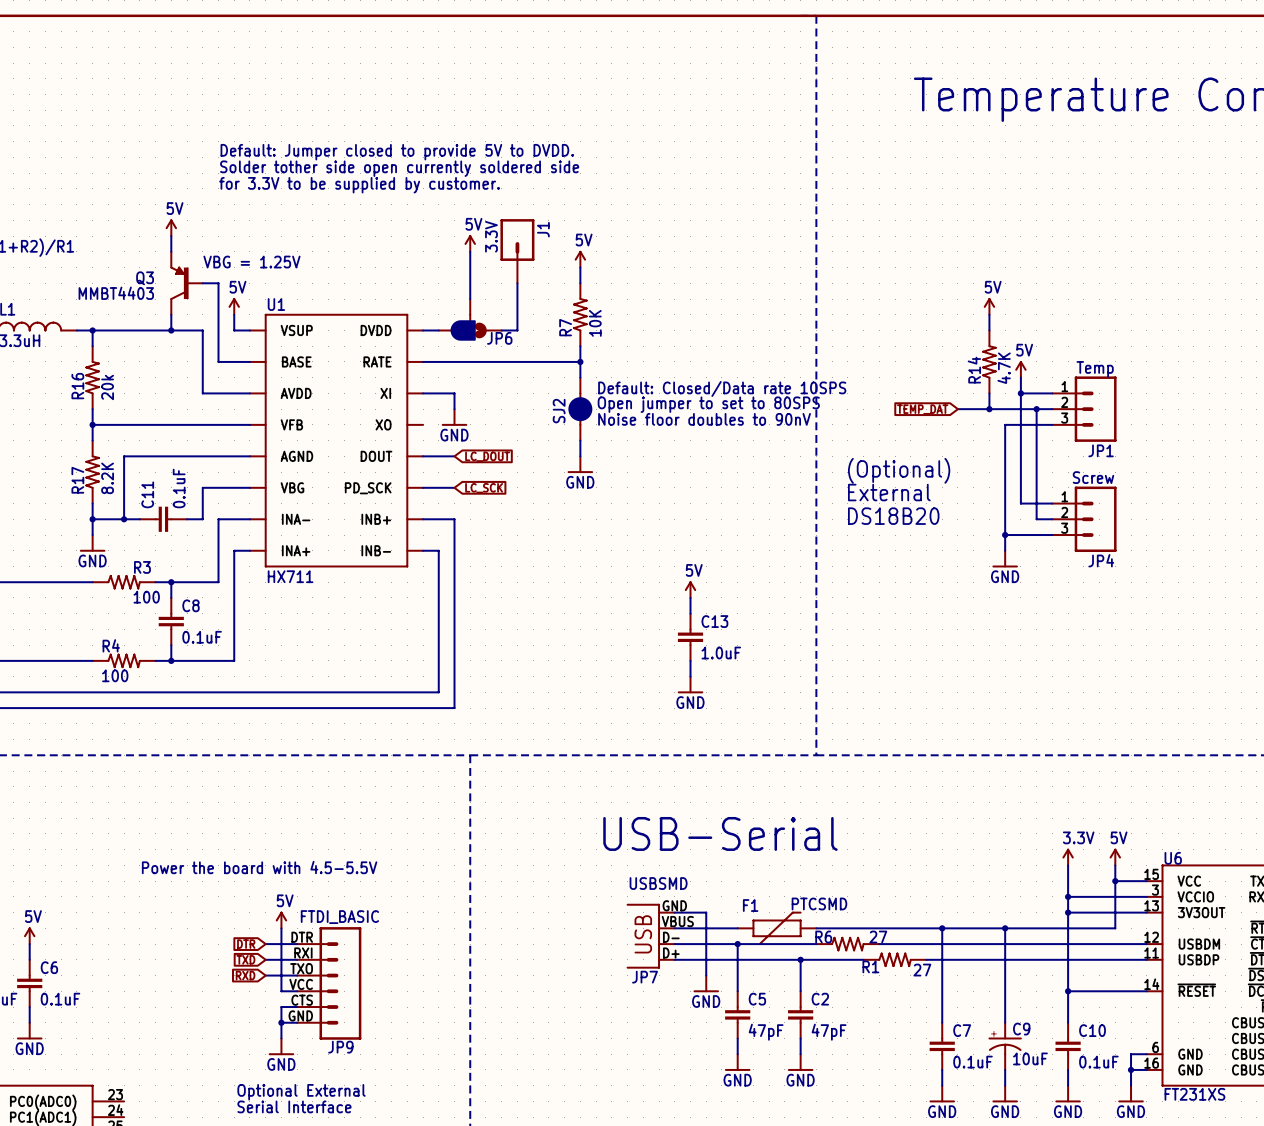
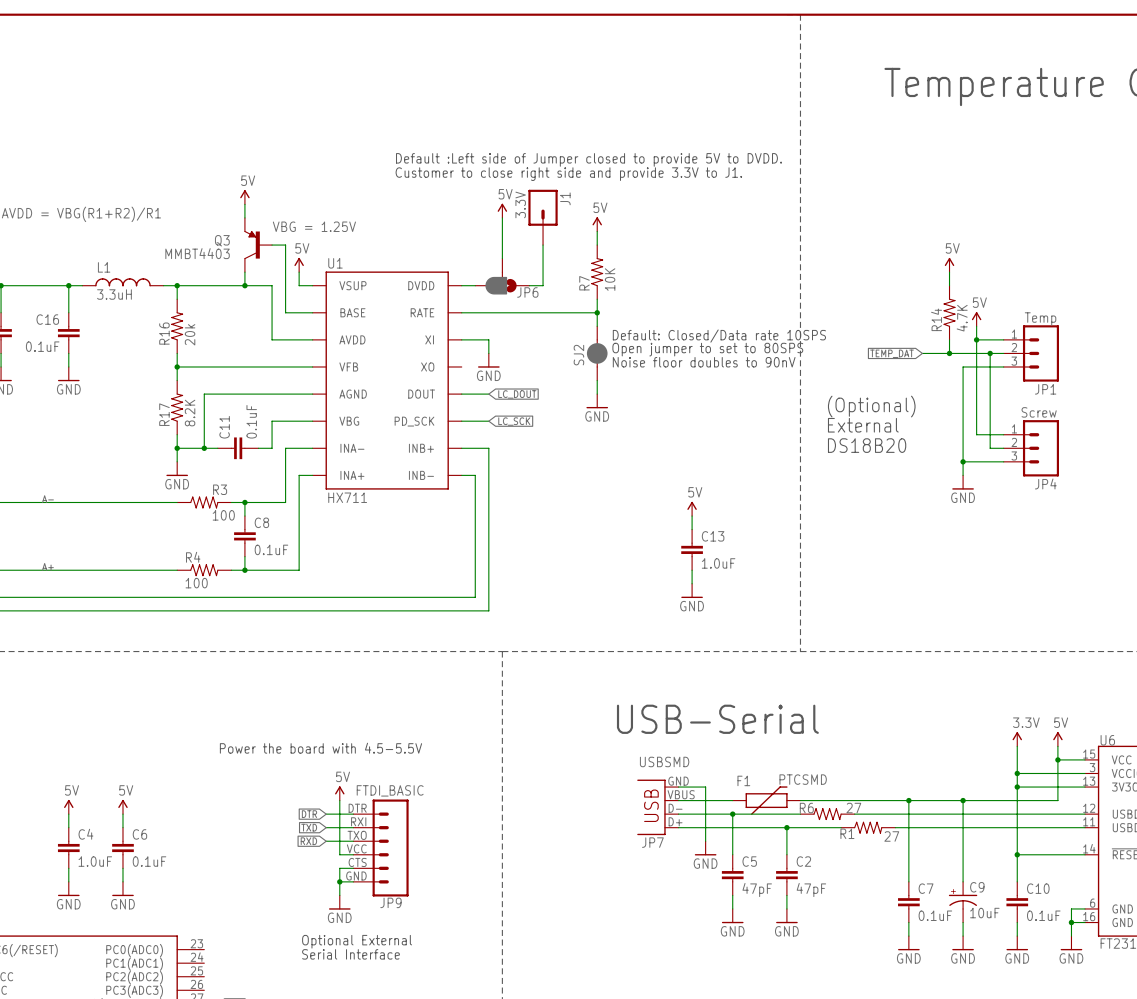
text: Default: Jumper closed to provide 5V to DVDD. (397, 152) -> none
text: Solder tother side open currently soldered side (399, 168) -> none
text: none -> Default :Left side of Jumper closed to provide 5V to DVDD. (588, 159)
text: for 3.3V to be supplied by customer. (359, 185) -> none
text: none -> Customer to close right side and provide 3.3V to J1. (568, 174)

